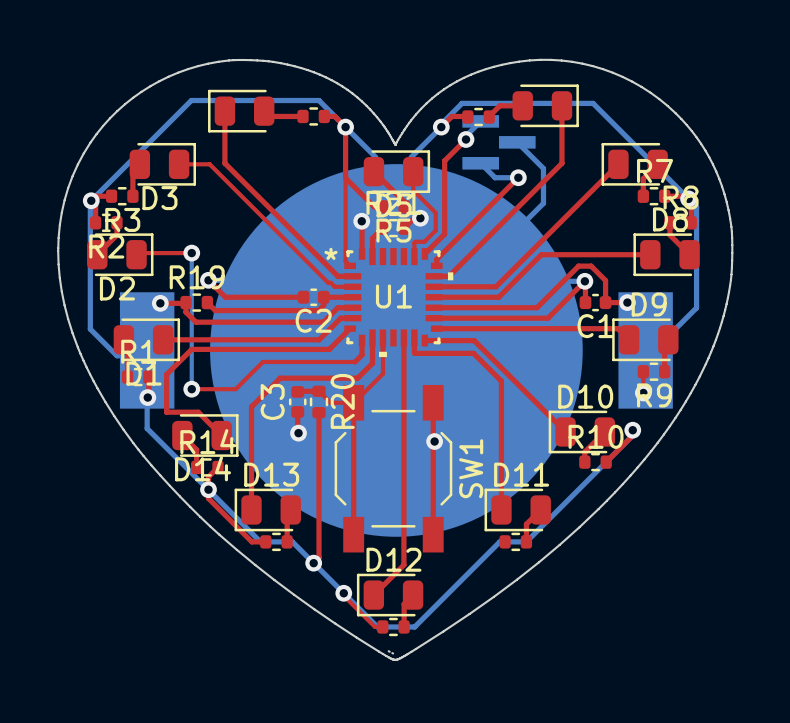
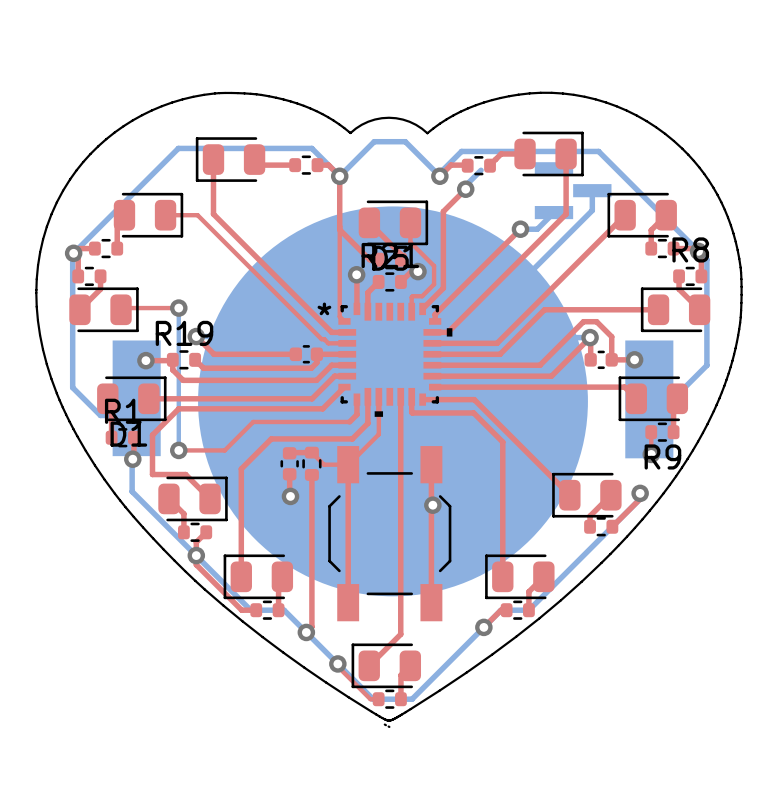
bottom track: (345, 127) (375, 157) -> (339, 176) (374, 141) (405, 141) (439, 176)
bottom track: (441, 127) (411, 157) -> none
board edge: (394, 142) (377, 117) (352, 93) (325, 77) (301, 68) (268, 61) (233, 60) (197, 66) (168, 76) (141, 91) (117, 111) (96, 134) (77, 164) (68, 187) (59, 225) (58, 264) (61, 291) -> (42, 349) (59, 400) (85, 450) (114, 493) (153, 538) (204, 589) (262, 637) (326, 682) (376, 714) (390, 720) (466, 672) (539, 618) (610, 554) (663, 493) (702, 432) (726, 379) (740, 322) (740, 267) (735, 241) (727, 217) (713, 187) (699, 167) (682, 148) (656, 127) (636, 115) (606, 102) (562, 93) (518, 94) (492, 100) (468, 108) (446, 119) (427, 133) (409, 121) (388, 117) (368, 121) (350, 133) (322, 114) (290, 101) (256, 94) (215, 93) (172, 102) (132, 120) (98, 146) (70, 179) (51, 214) (40, 252) (36, 292) (37, 320) (42, 348)
part position: (498, 142) -> (573, 190)
bottom track: (517, 142) (543, 168) (543, 203) -> (592, 190) (592, 210) (546, 256)
board edge: (395, 143) (411, 120) (432, 98) (456, 81) (478, 71) (510, 63) (540, 59) (572, 61) (602, 69) (632, 81) (659, 99) (681, 119) (696, 137) (709, 157) (722, 186) (730, 218) (732, 245) (729, 291) (713, 346) (685, 401) (651, 451) (598, 509) (538, 562) (469, 614) (398, 659) (390, 658) (356, 637) (274, 580) (219, 534) (169, 485) (133, 443) (97, 388) (77, 347) (61, 292) -> none
bottom track: (480, 163) (495, 177) (518, 177) -> (553, 212) (537, 229) (520, 229)
part footprint: [119, 164, 673, 537] -> [112, 206, 674, 597]
R7 name: R7 (655, 170) -> none
D3 name: D3 (159, 198) -> none
R3 name: R3 (122, 219) -> none
D8 name: D8 (670, 219) -> none
R5 name: R5 (393, 230) -> none
R2 name: R2 (106, 246) -> none
D2 name: D2 (117, 288) -> none
U1 name: U1 (393, 296) -> none
D9 name: D9 (649, 304) -> none
C2 name: C2 (313, 320) -> none
C1 name: C1 (595, 326) -> none
D10 name: D10 (585, 396) -> none
C3 name: C3 (272, 401) -> none
R20 name: R20 (342, 401) -> none
R10 name: R10 (596, 436) -> none
R14 name: R14 (208, 441) -> none
D14 name: D14 (203, 468) -> none
SW1 name: SW1 (471, 468) -> none
D13 name: D13 (271, 474) -> none
D11 name: D11 (521, 474) -> none
top track: none -> (506, 610) (501, 610) (483, 627)
via: none -> (483, 627)
D12 name: D12 (393, 559) -> none

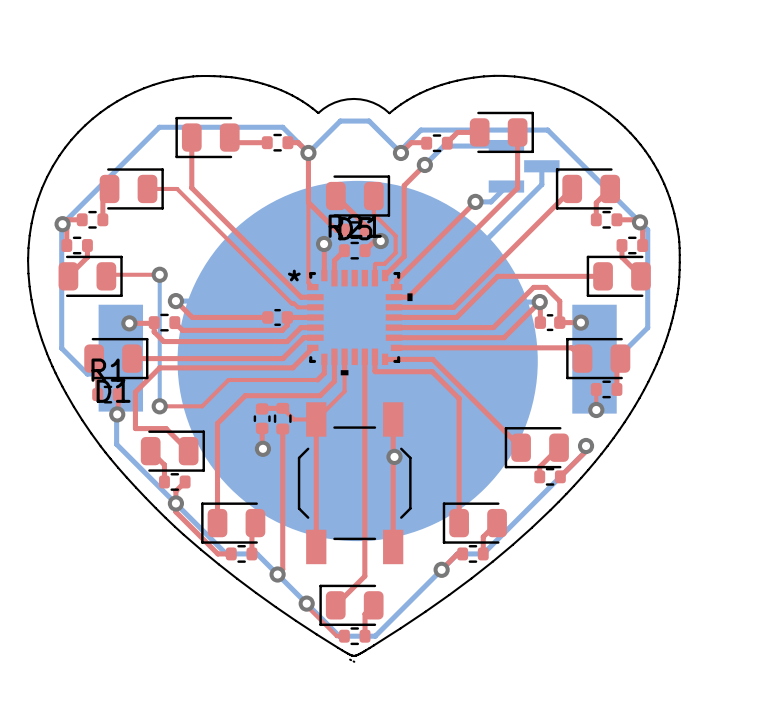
bottom track: (481, 170) (465, 185) (465, 189) -> (506, 146) (443, 146) (424, 164)
R8 name: R8 (690, 249) -> none
R19 name: R19 (184, 333) -> none
R9 name: R9 (662, 456) -> none

